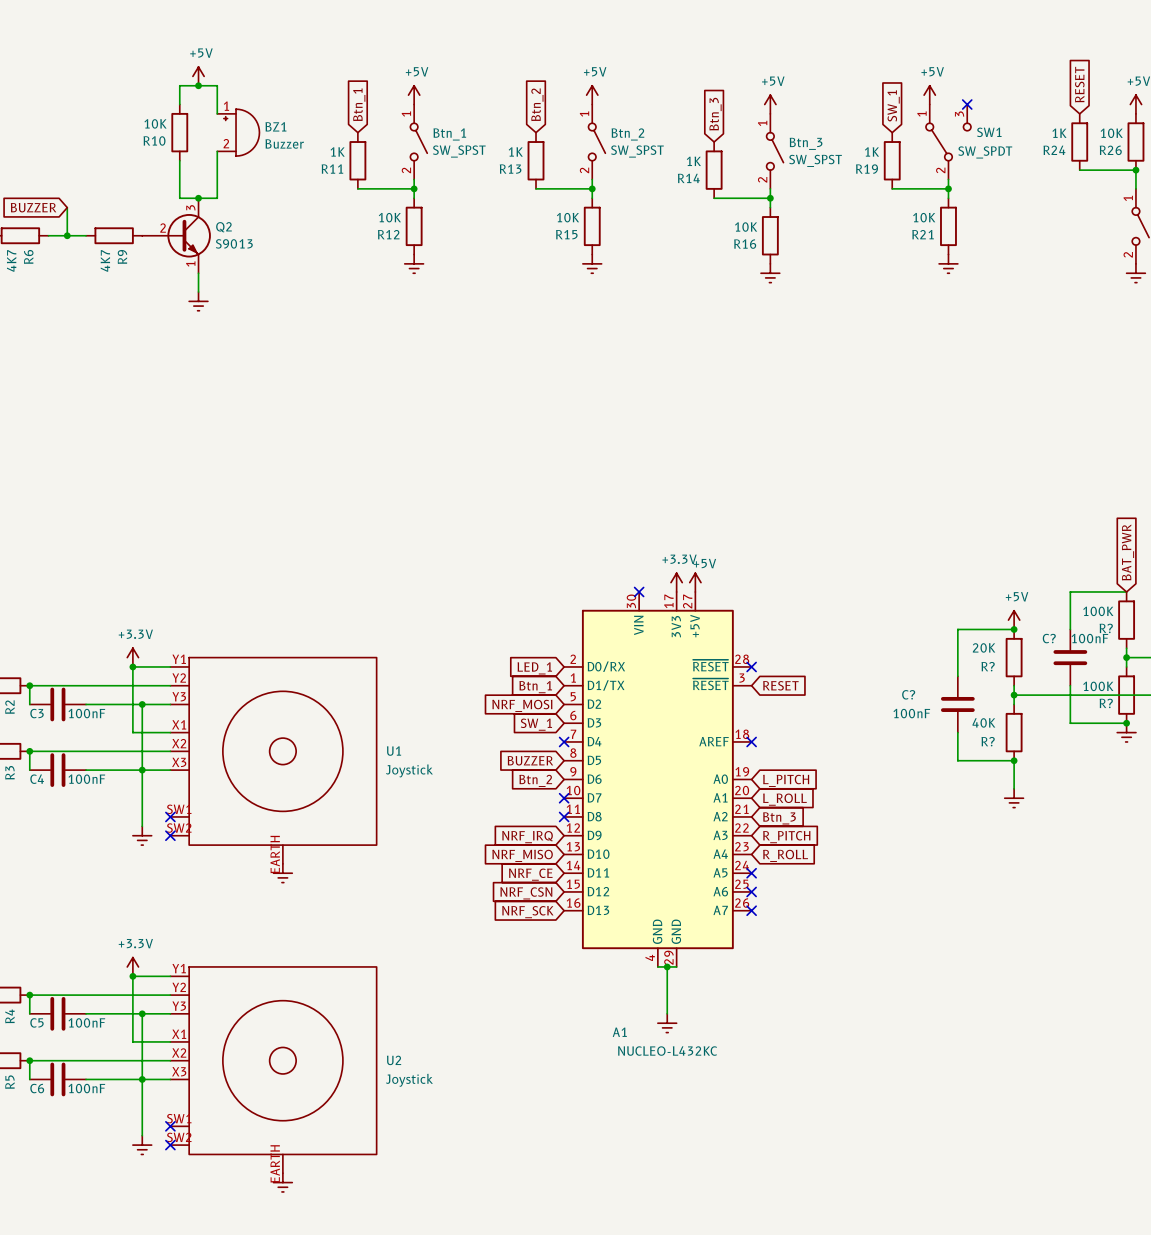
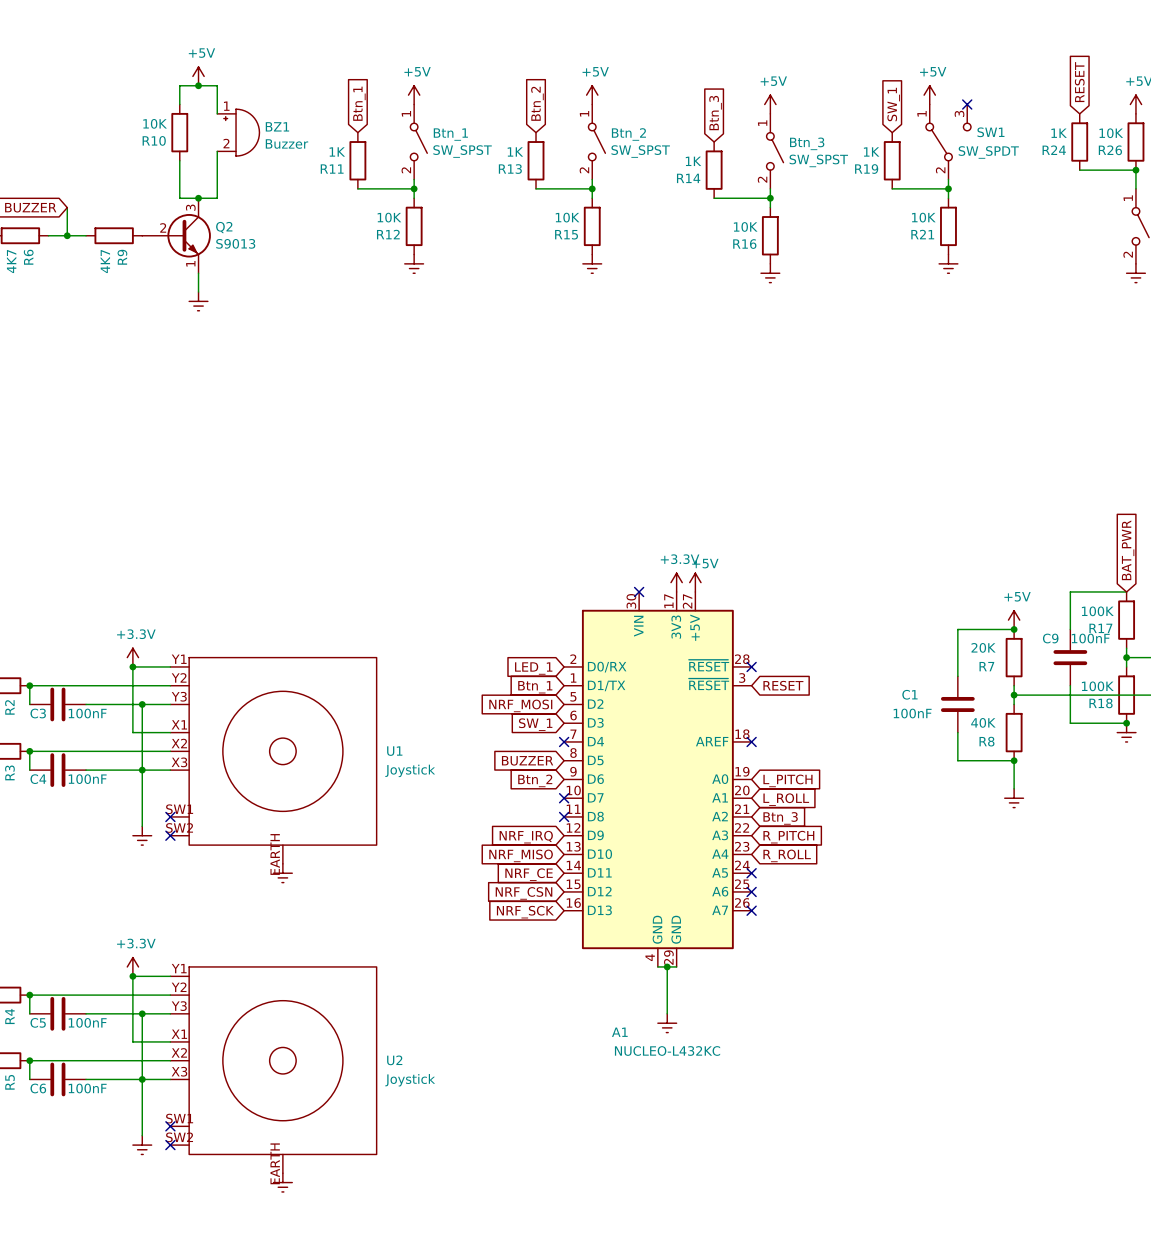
R? name: R? (1106, 628) -> R17 (1100, 628)
C? name: C? (1049, 638) -> C9 (1050, 638)
R? name: R? (988, 666) -> R7 (986, 666)
C? name: C? (908, 694) -> C1 (909, 694)
R? name: R? (1106, 703) -> R18 (1101, 703)
R? name: R? (988, 741) -> R8 (986, 741)

